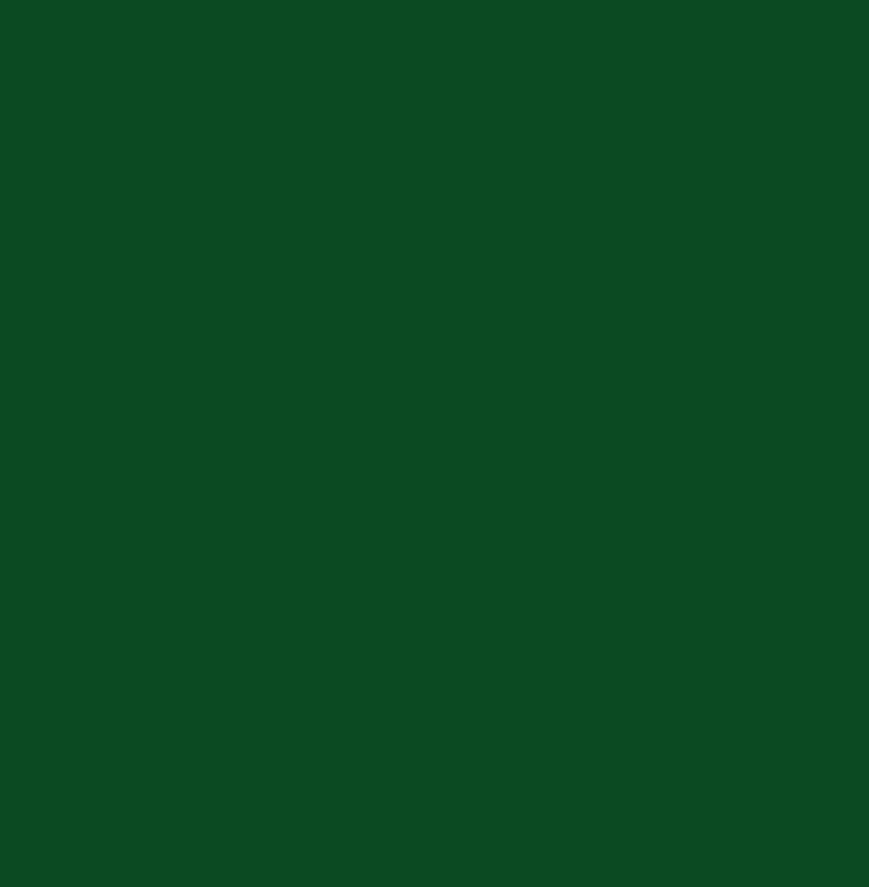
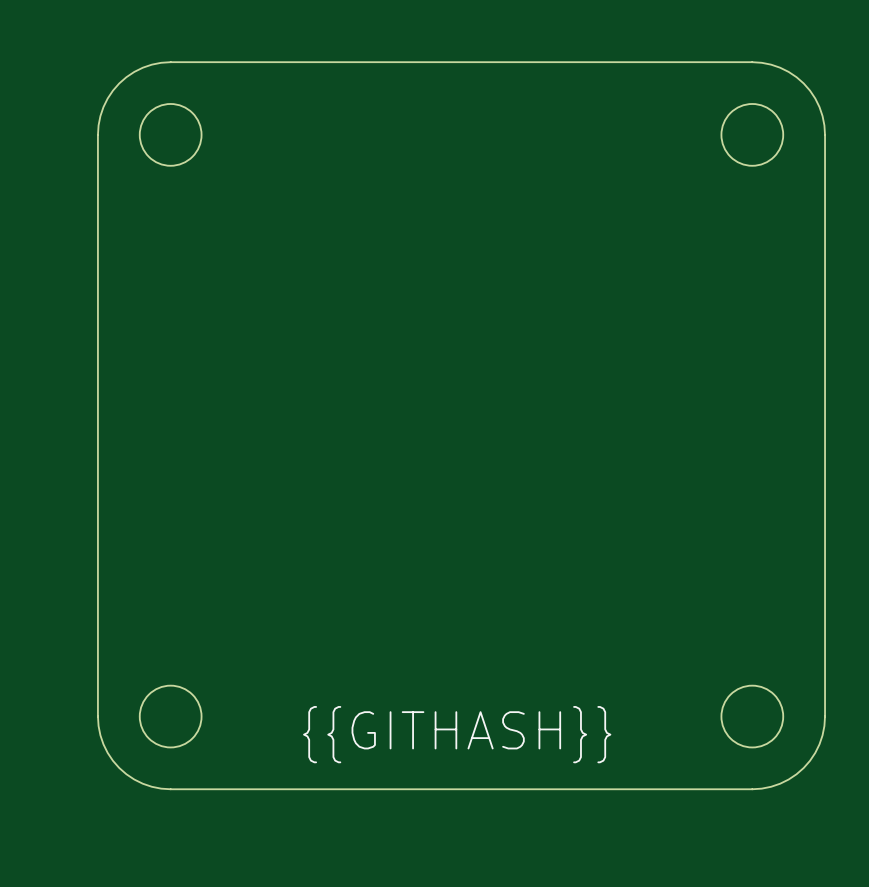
board edge: none -> (170, 62) (752, 62) (780, 67) (803, 83) (819, 107) (825, 134) (825, 716) (819, 744) (803, 767) (780, 783) (752, 789) (170, 789) (142, 783) (119, 767) (103, 744) (97, 716) (98, 125) (107, 98) (119, 83) (142, 67) (170, 62)
round board edge: none -> [138, 103, 203, 167]
round board edge: none -> [720, 103, 785, 167]
round board edge: none -> [138, 684, 203, 749]
round board edge: none -> [720, 684, 785, 749]
text: none -> {{GITHASH}} (457, 734)

